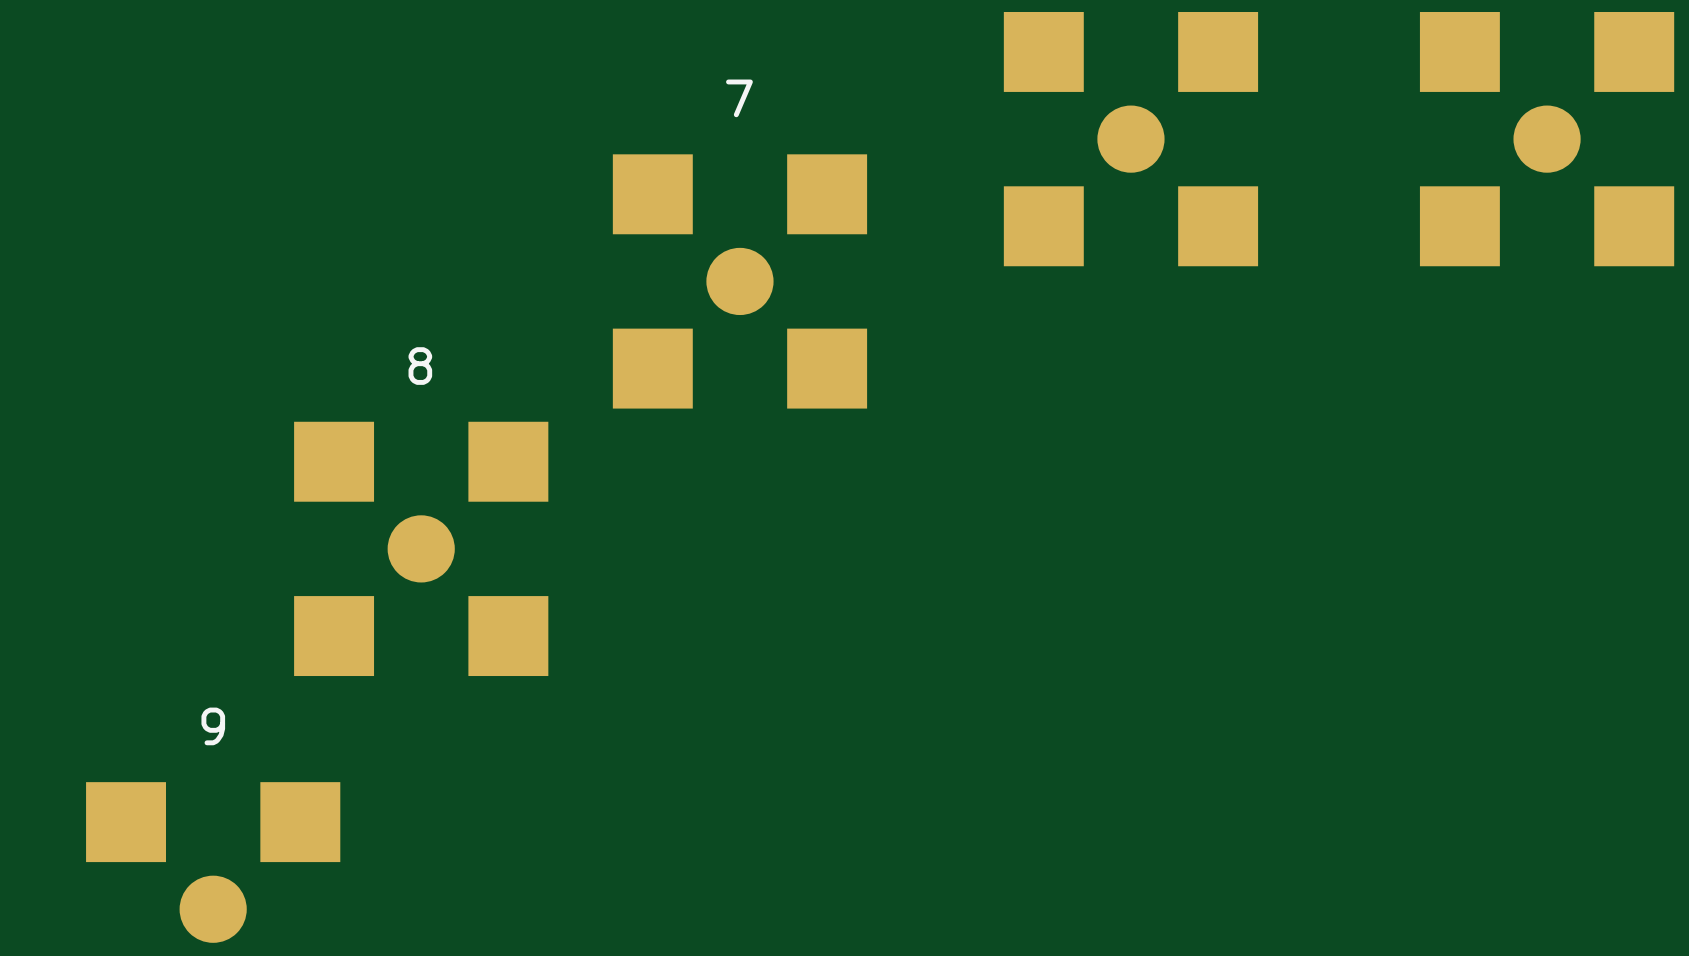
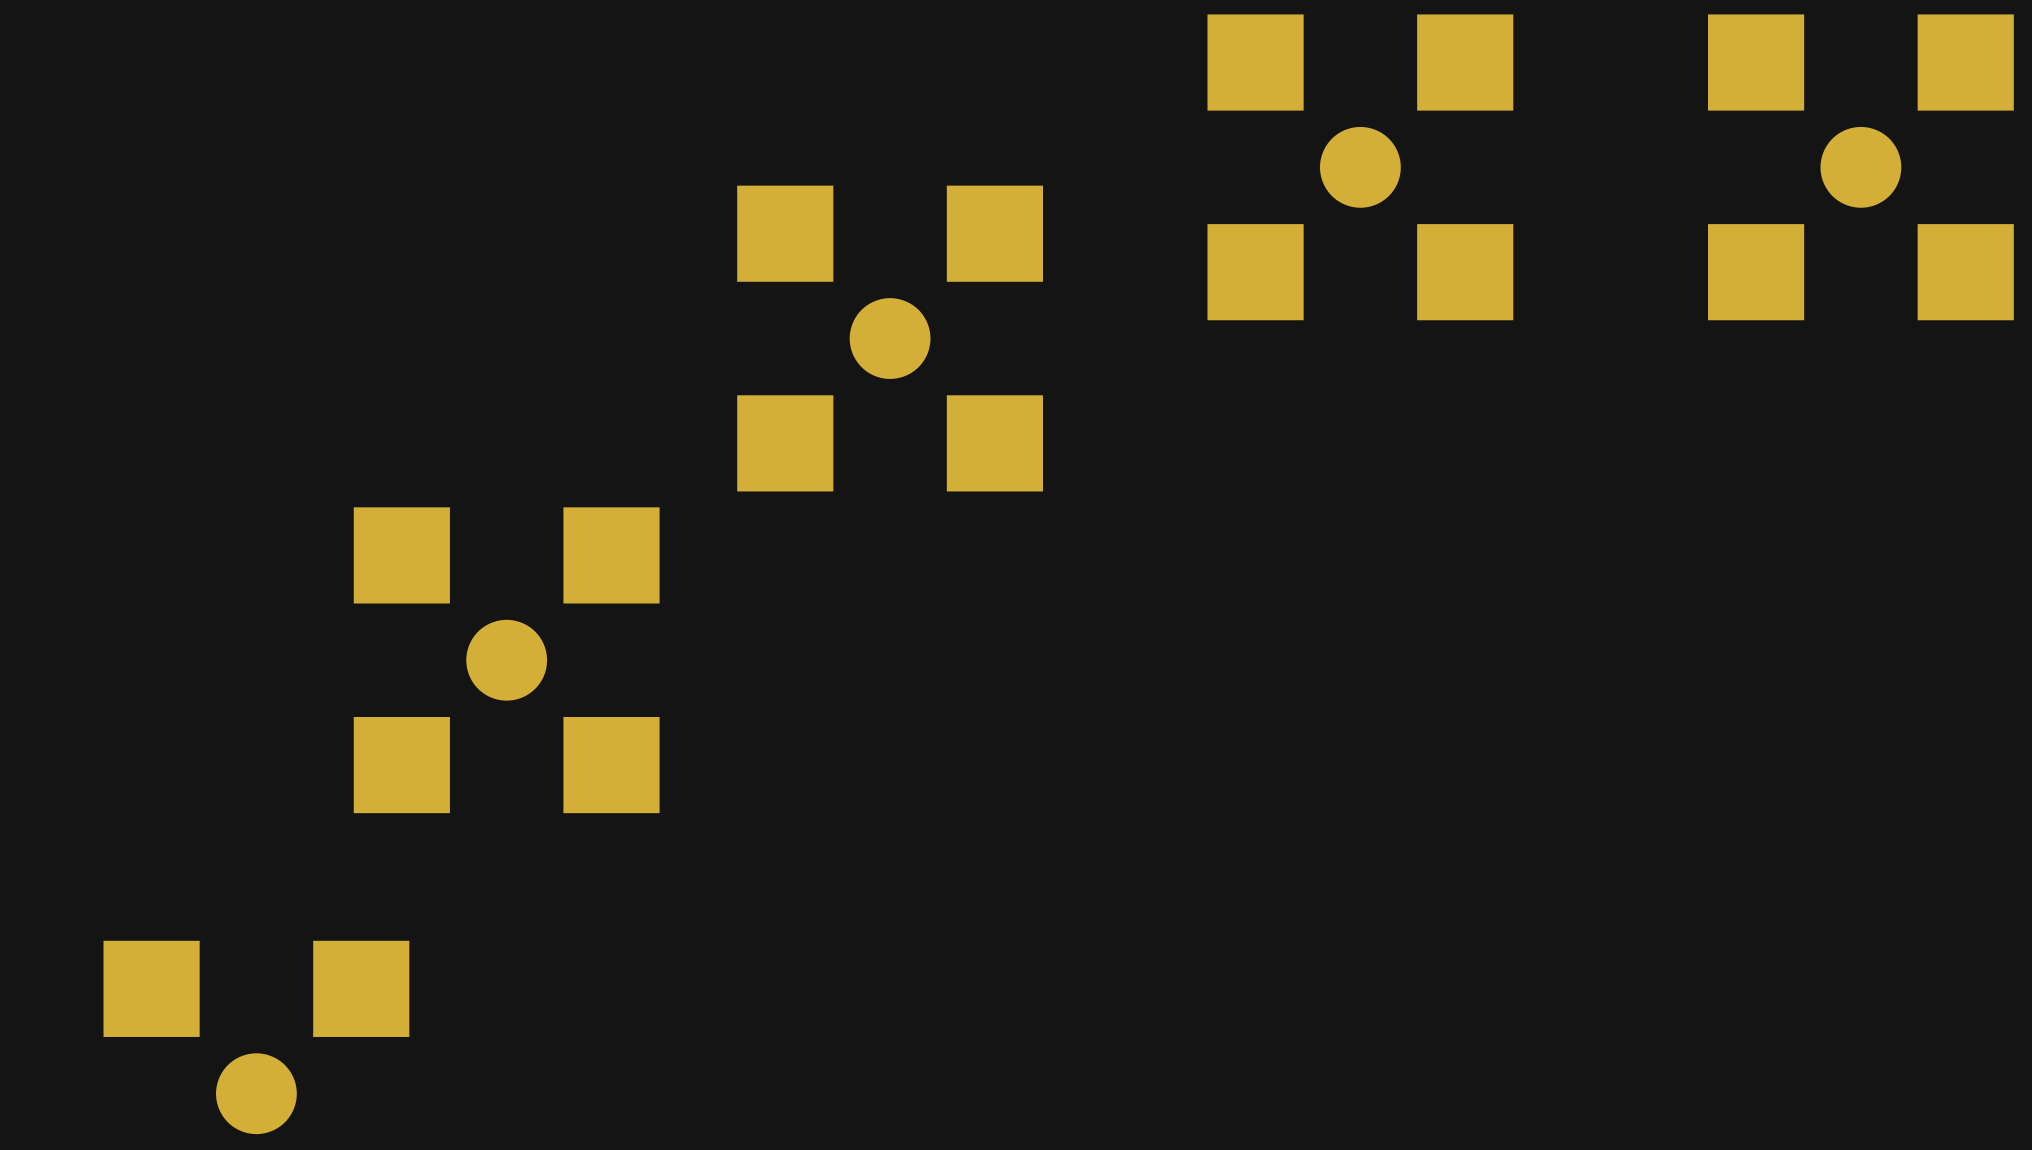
text: 7 (739, 98) -> none
text: 8 (420, 366) -> none
text: 9 (213, 726) -> none

